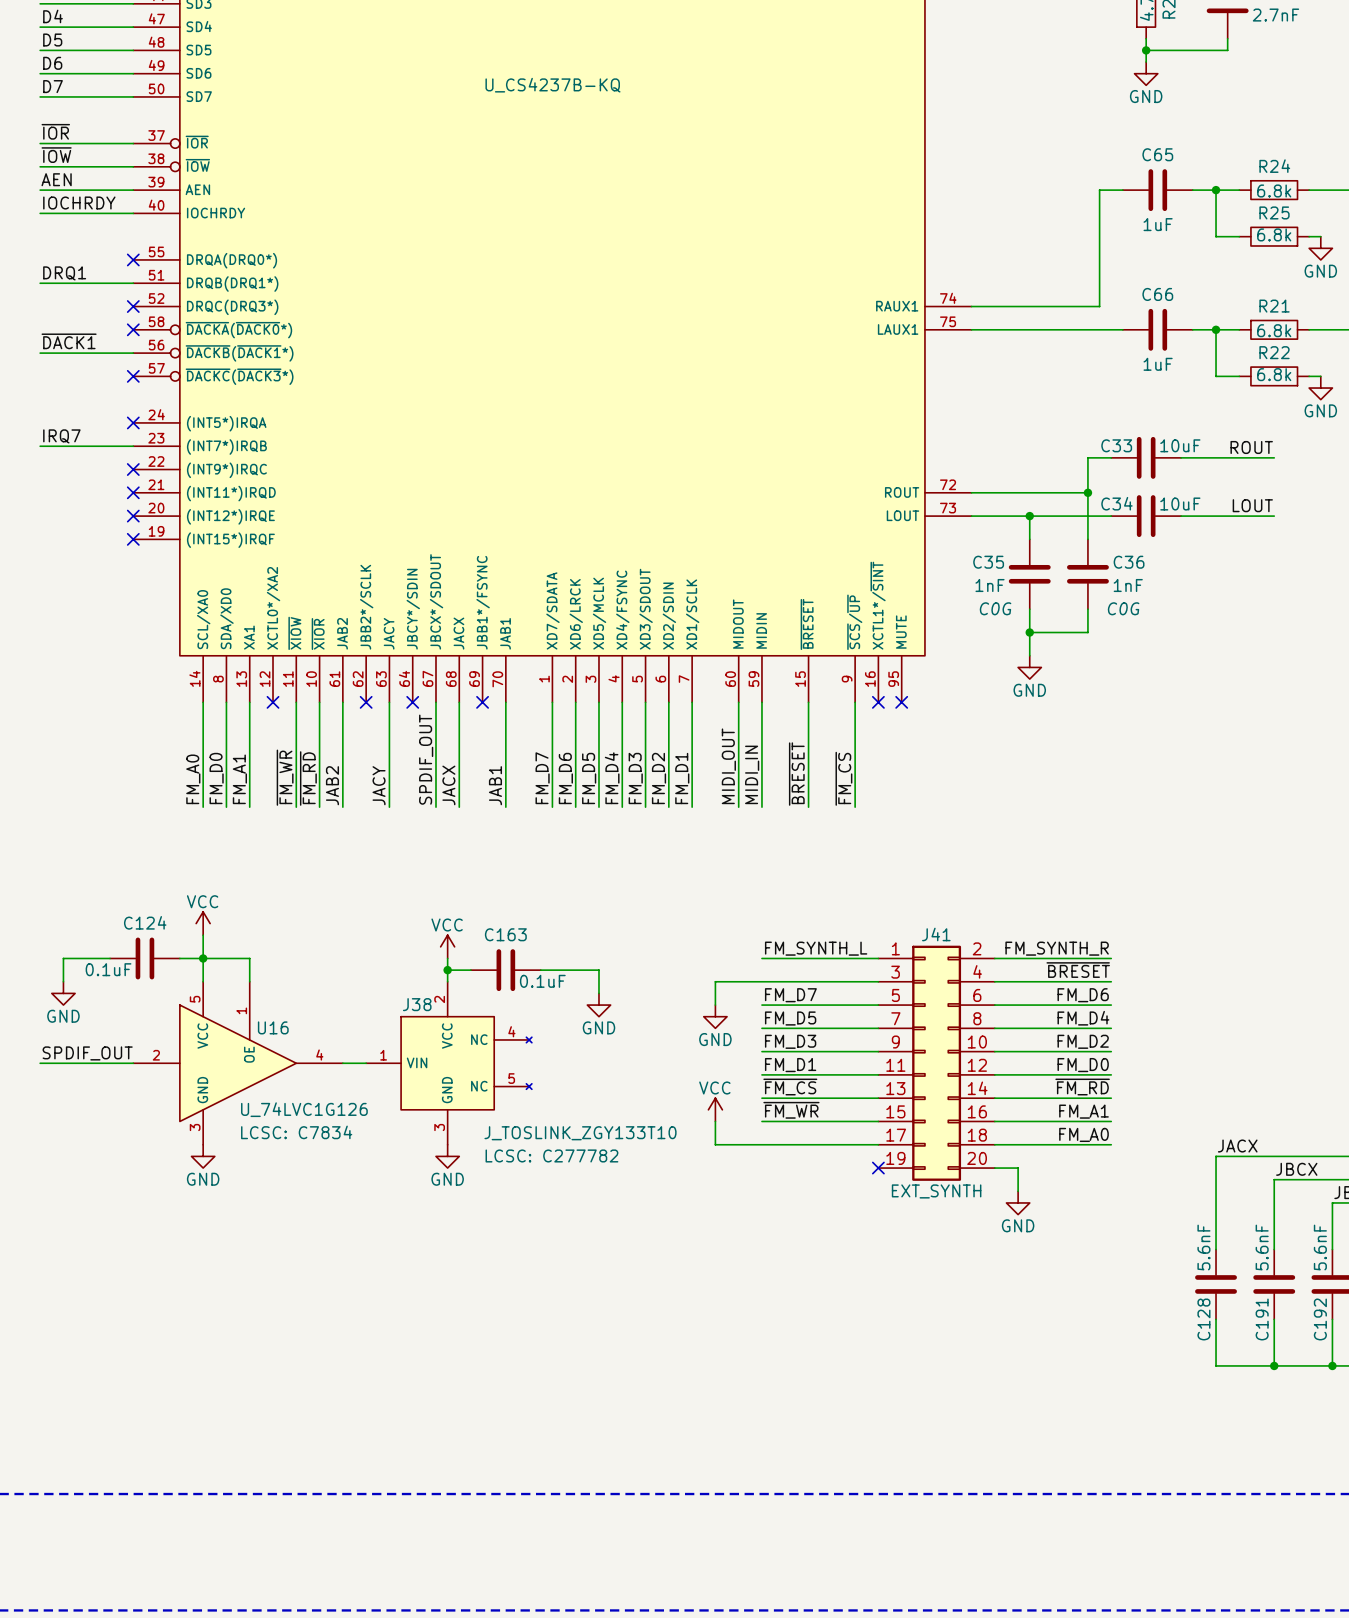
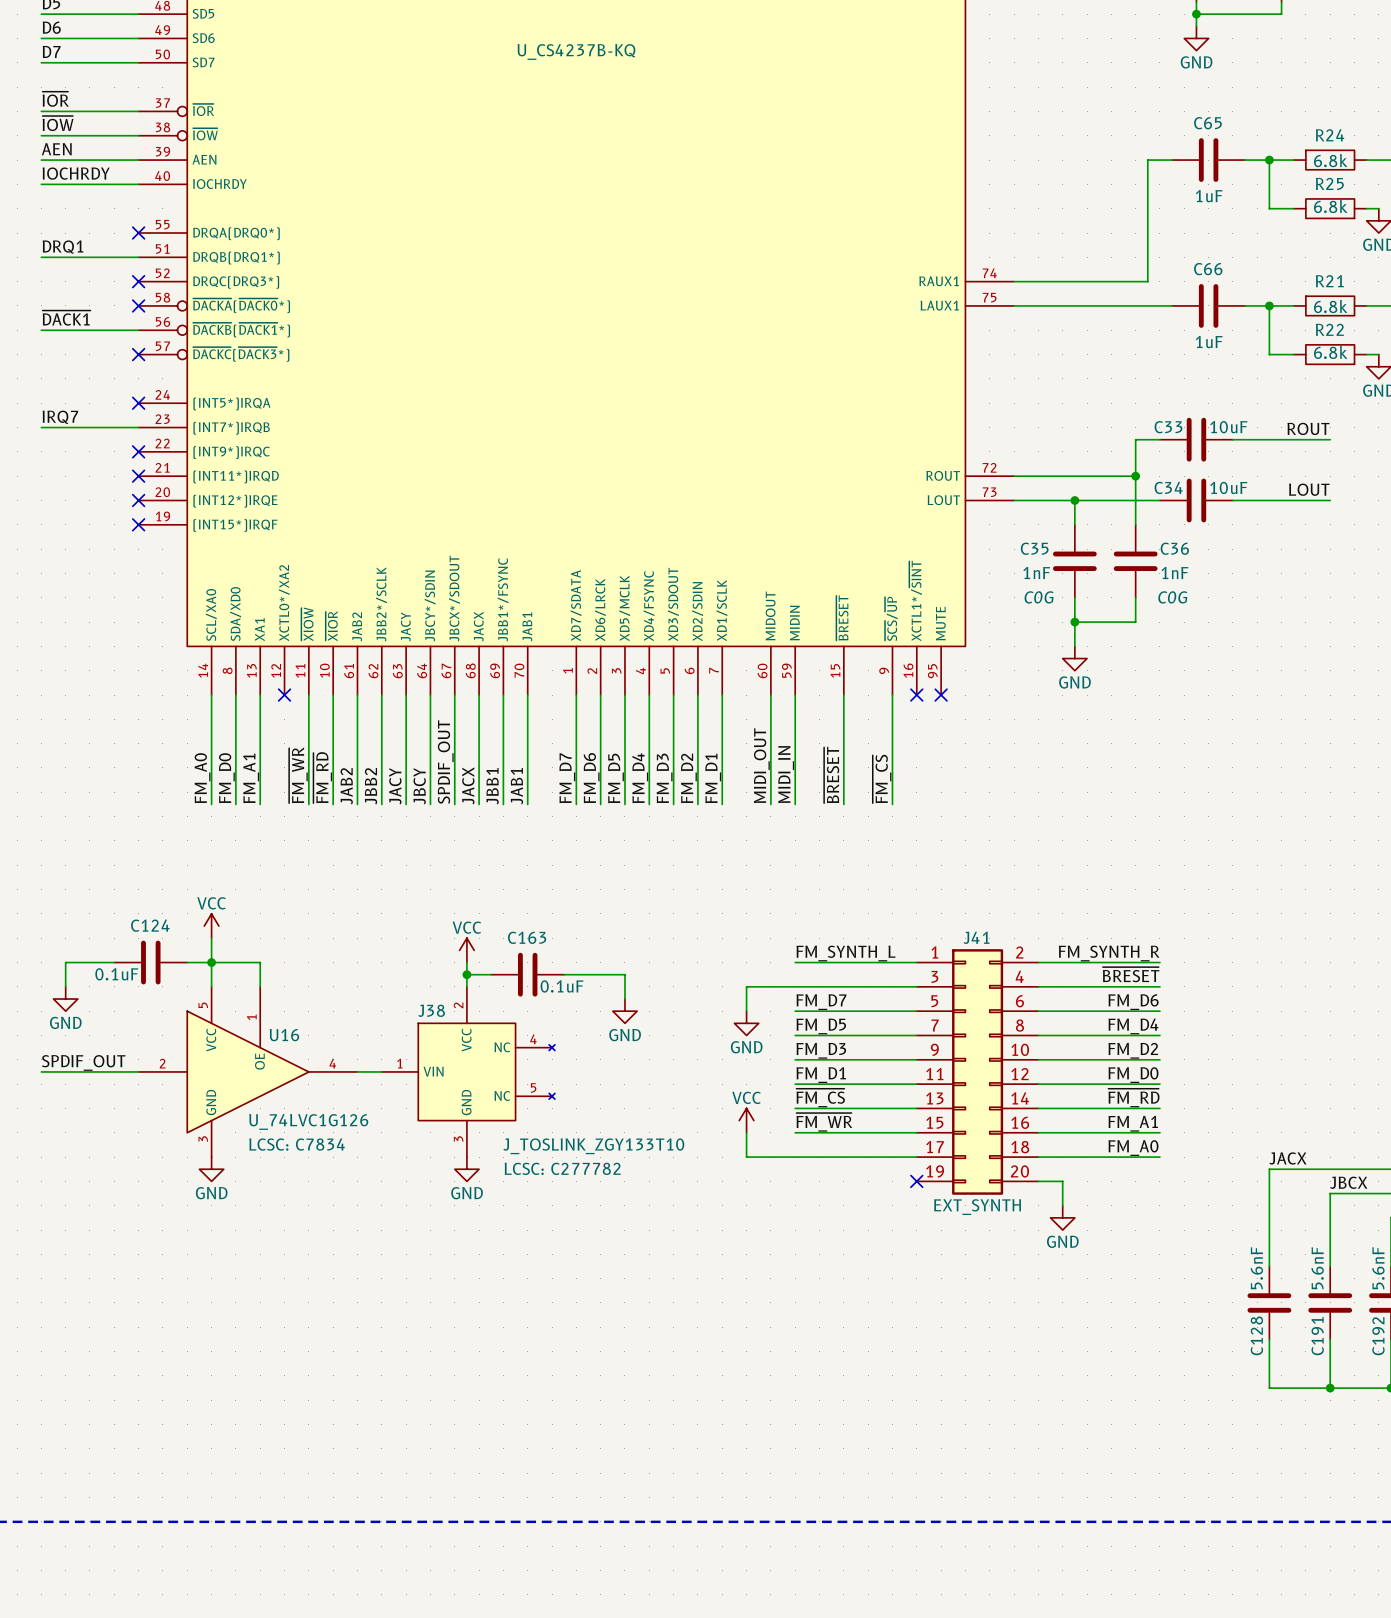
wire: none -> (381, 695) (381, 804)
no-connect mark: (366, 702) -> none
wire: none -> (430, 695) (430, 804)
no-connect mark: (412, 702) -> none
wire: none -> (503, 695) (503, 804)
no-connect mark: (482, 702) -> none
label: none -> JBB2 (371, 786)
label: none -> JBCY (419, 786)
label: none -> JBB1 (492, 786)

